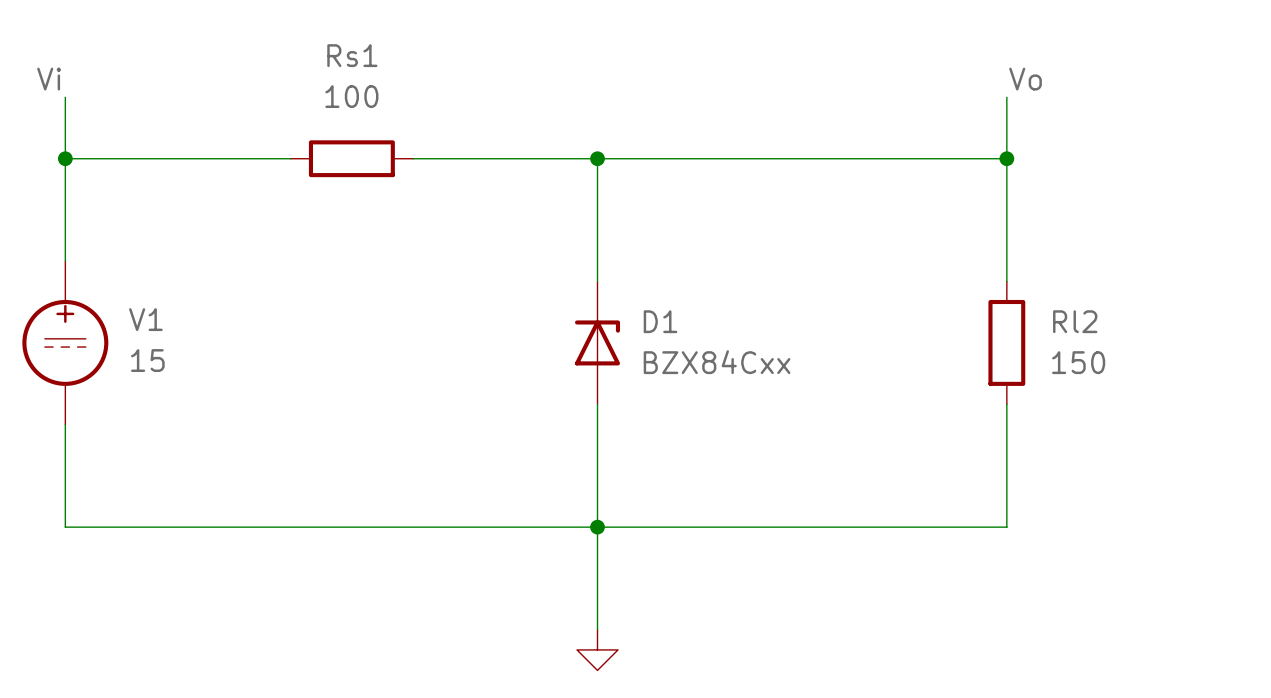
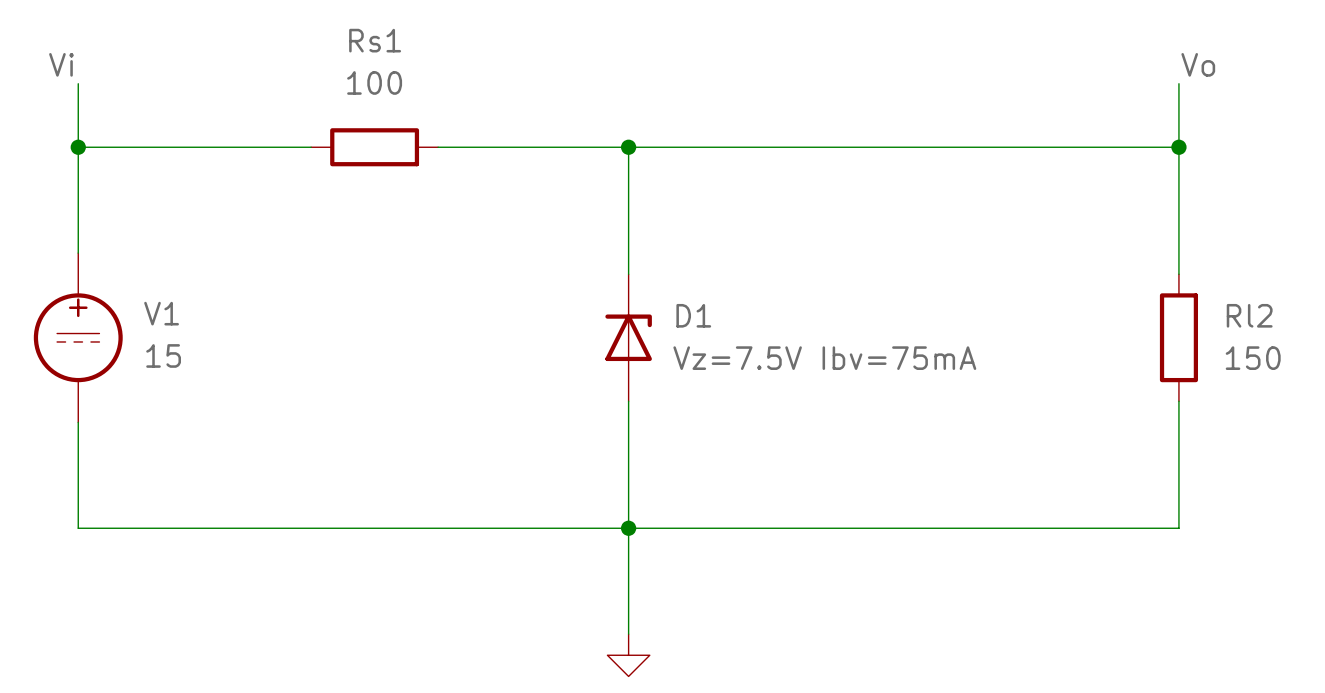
label position: Vo (1025, 79) -> Vo (1198, 64)
wire: (1006, 97) (1006, 281) -> (1178, 83) (1178, 274)
wire: none -> (1051, 147) (1178, 147)
junction: (1006, 158) -> none
junction: none -> (1178, 147)
Rl2 position: (1006, 342) -> (1178, 337)
D1 value: BZX84Cxx (717, 362) -> Vz=7.5V Ibv=75mA (824, 358)
wire: (1006, 404) (1006, 527) -> (1178, 401) (1178, 528) (1051, 528)

